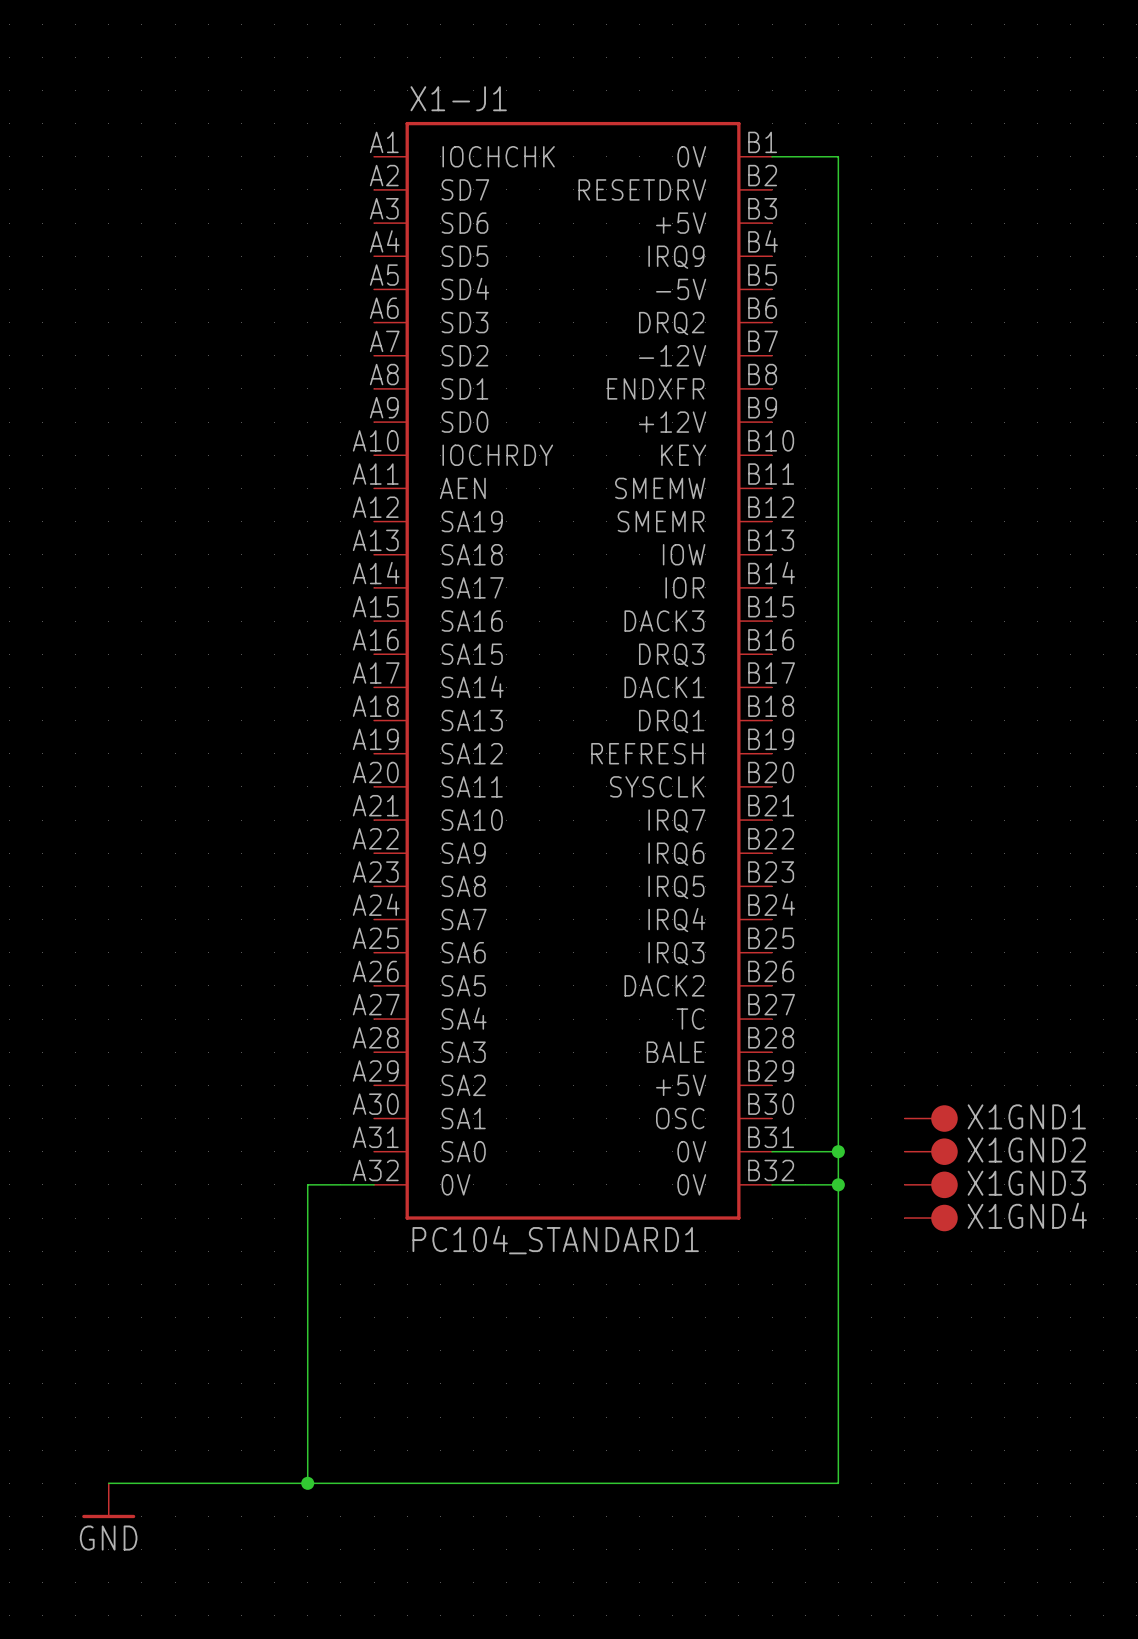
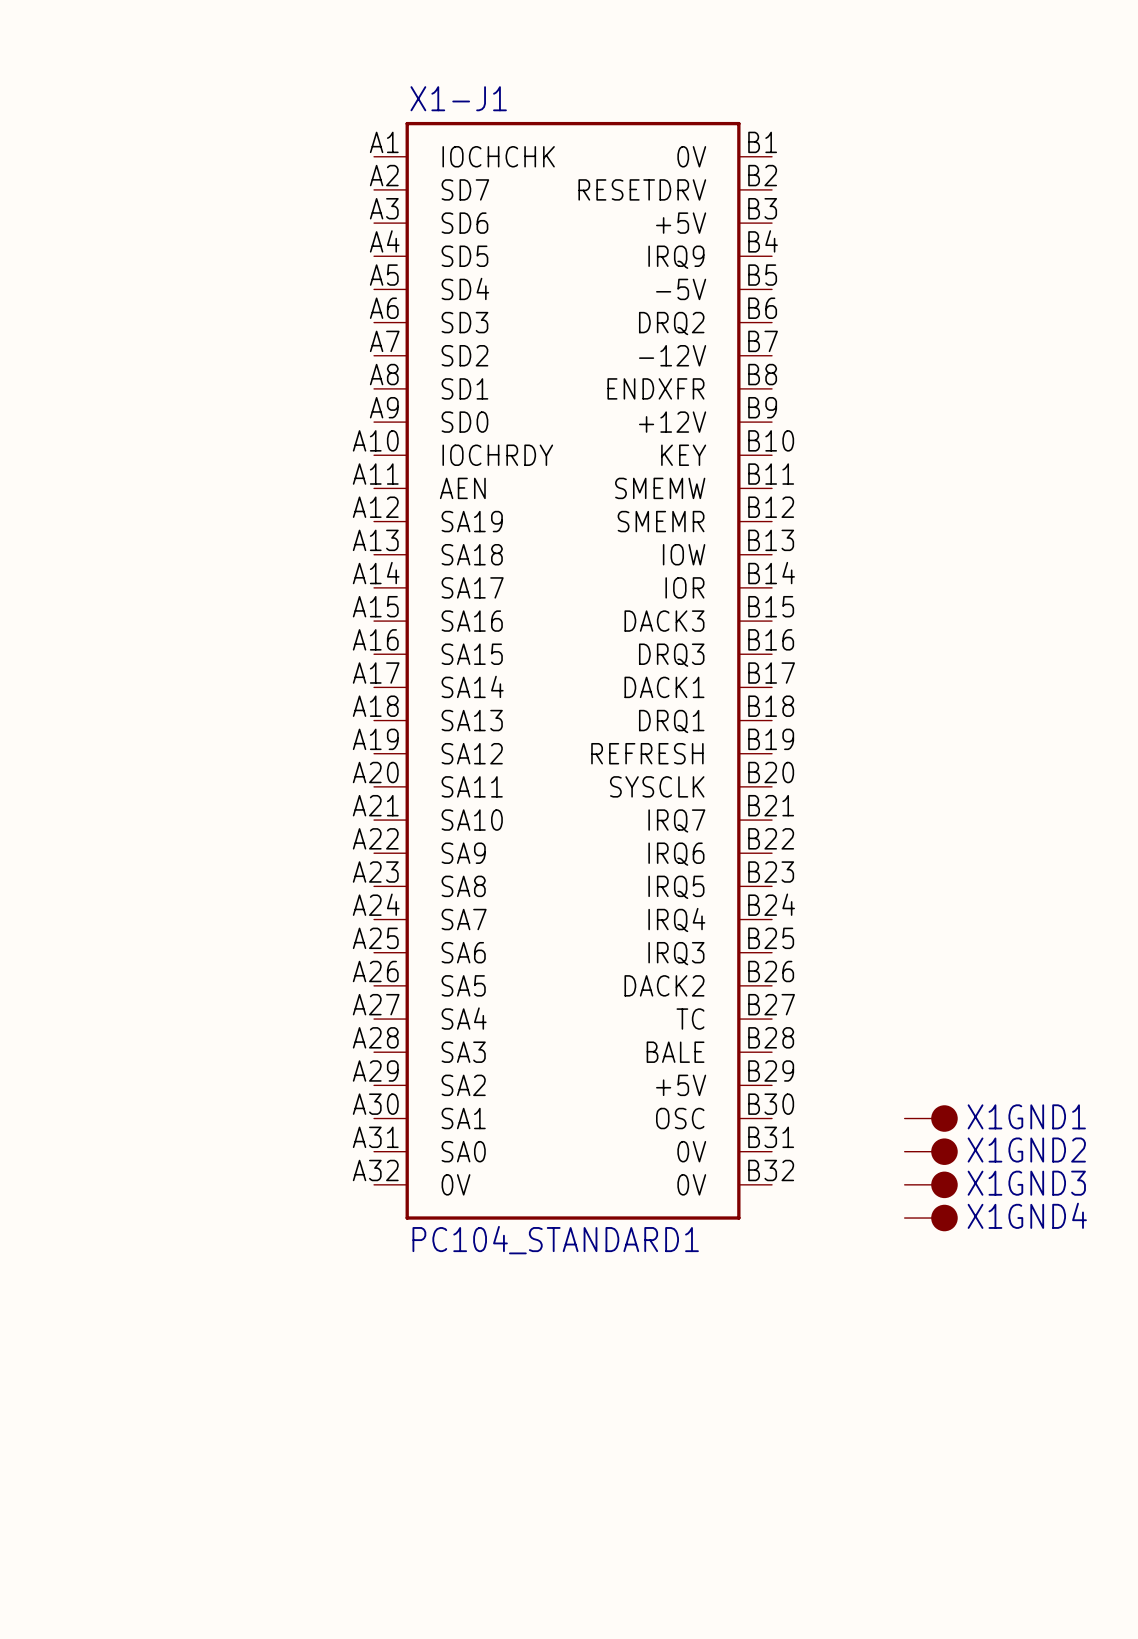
wire: (772, 156) (838, 156) (838, 1483) (108, 1483) -> none
wire: (772, 1151) (838, 1151) -> none
junction: (838, 1151) -> none
wire: (374, 1184) (307, 1184) (307, 1483) -> none
wire: (772, 1184) (838, 1184) -> none
junction: (838, 1184) -> none
junction: (307, 1483) -> none
power symbol: GND (108, 1500) -> none

